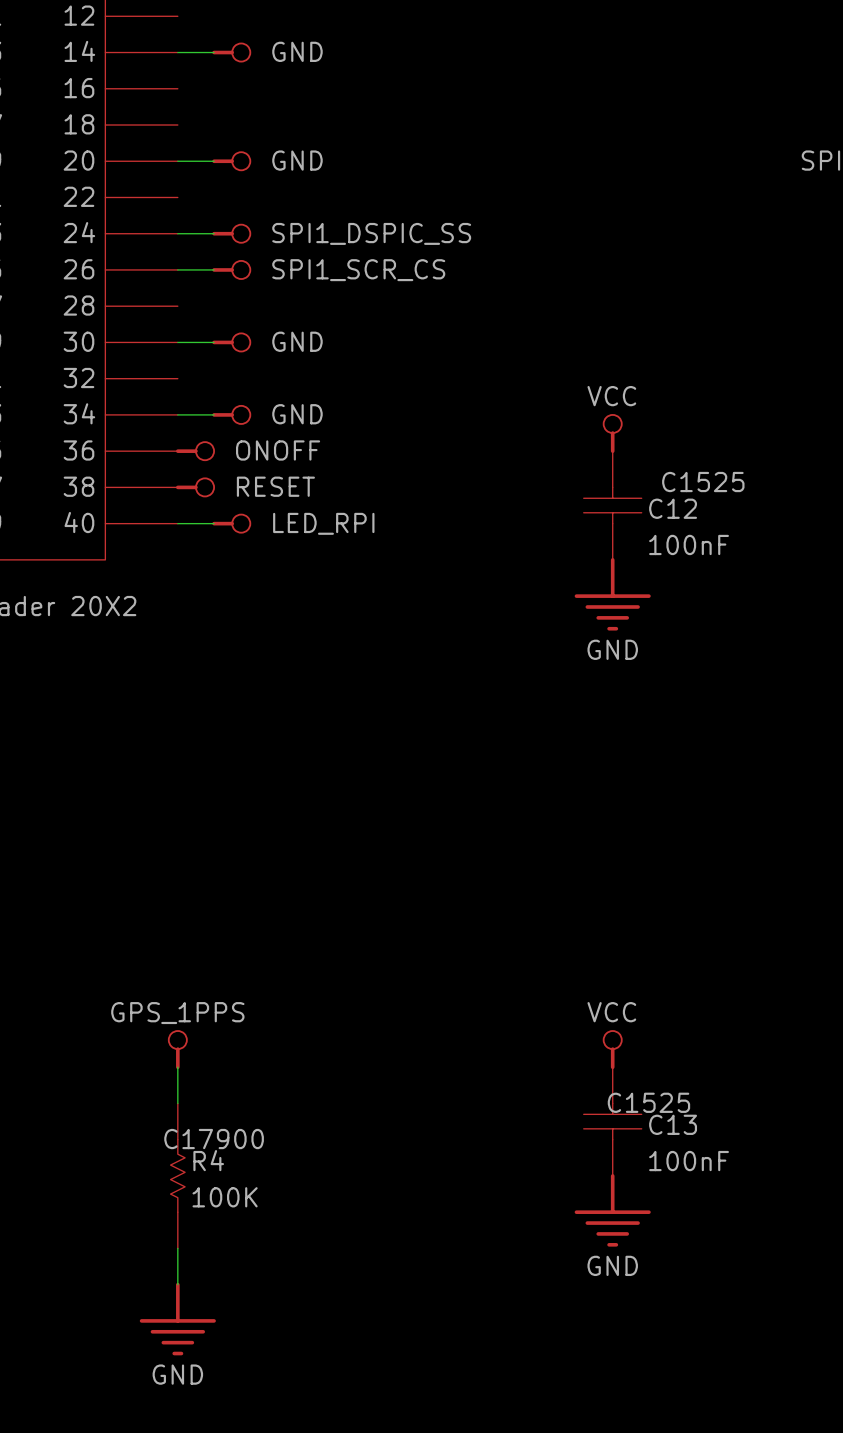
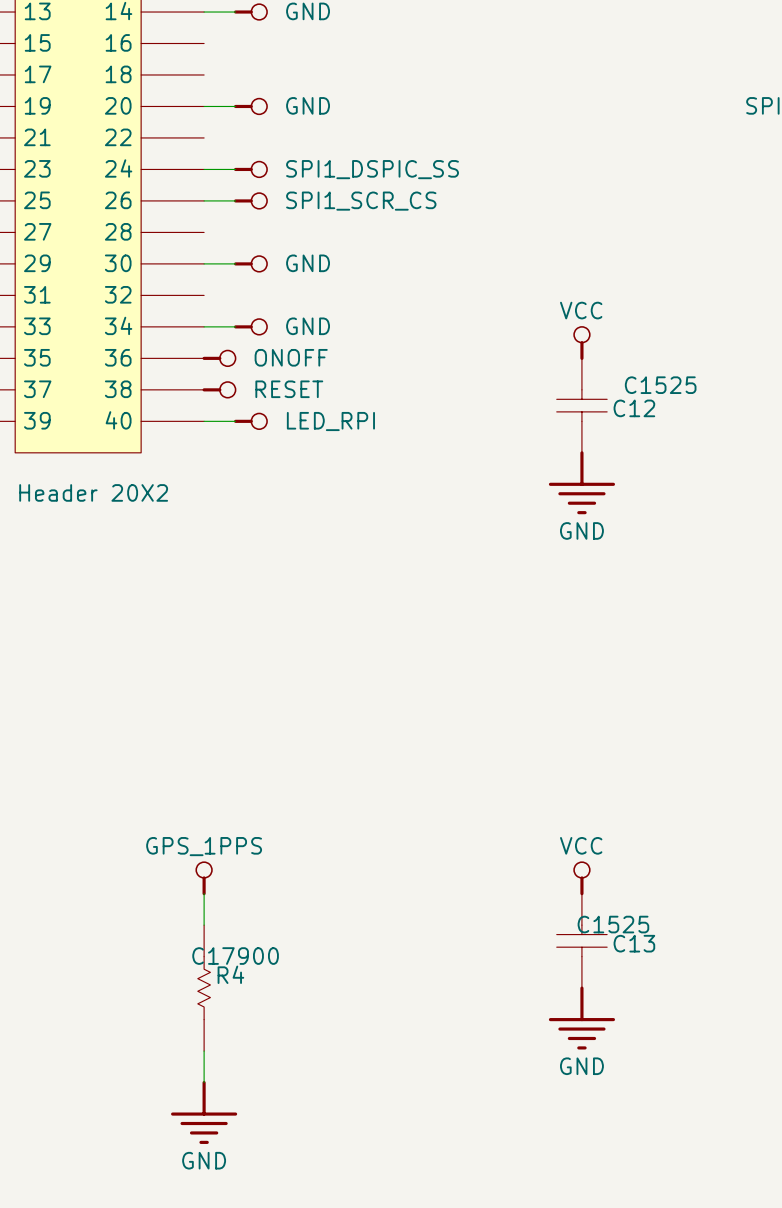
C12 text: 100nF (689, 544) -> none
C13 text: 100nF (689, 1161) -> none
R4 text: 100K (225, 1197) -> none

